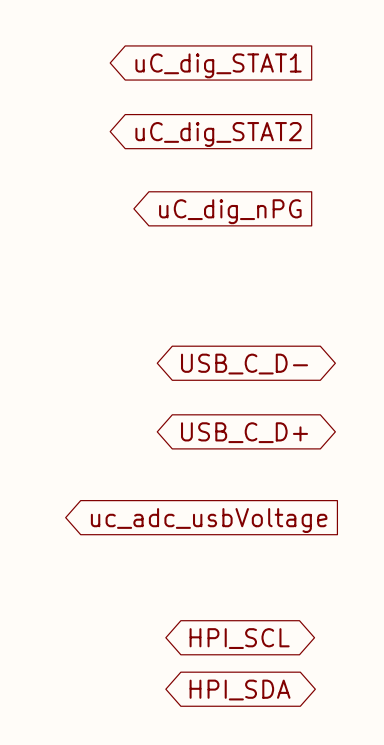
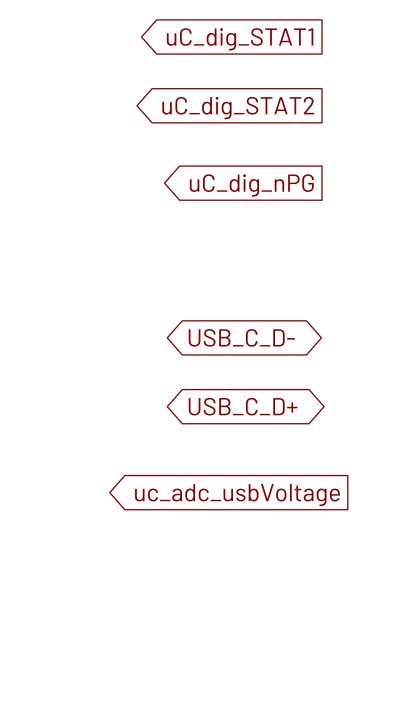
global label: HPI_SCL (239, 638) -> none
global label: HPI_SDA (240, 690) -> none

